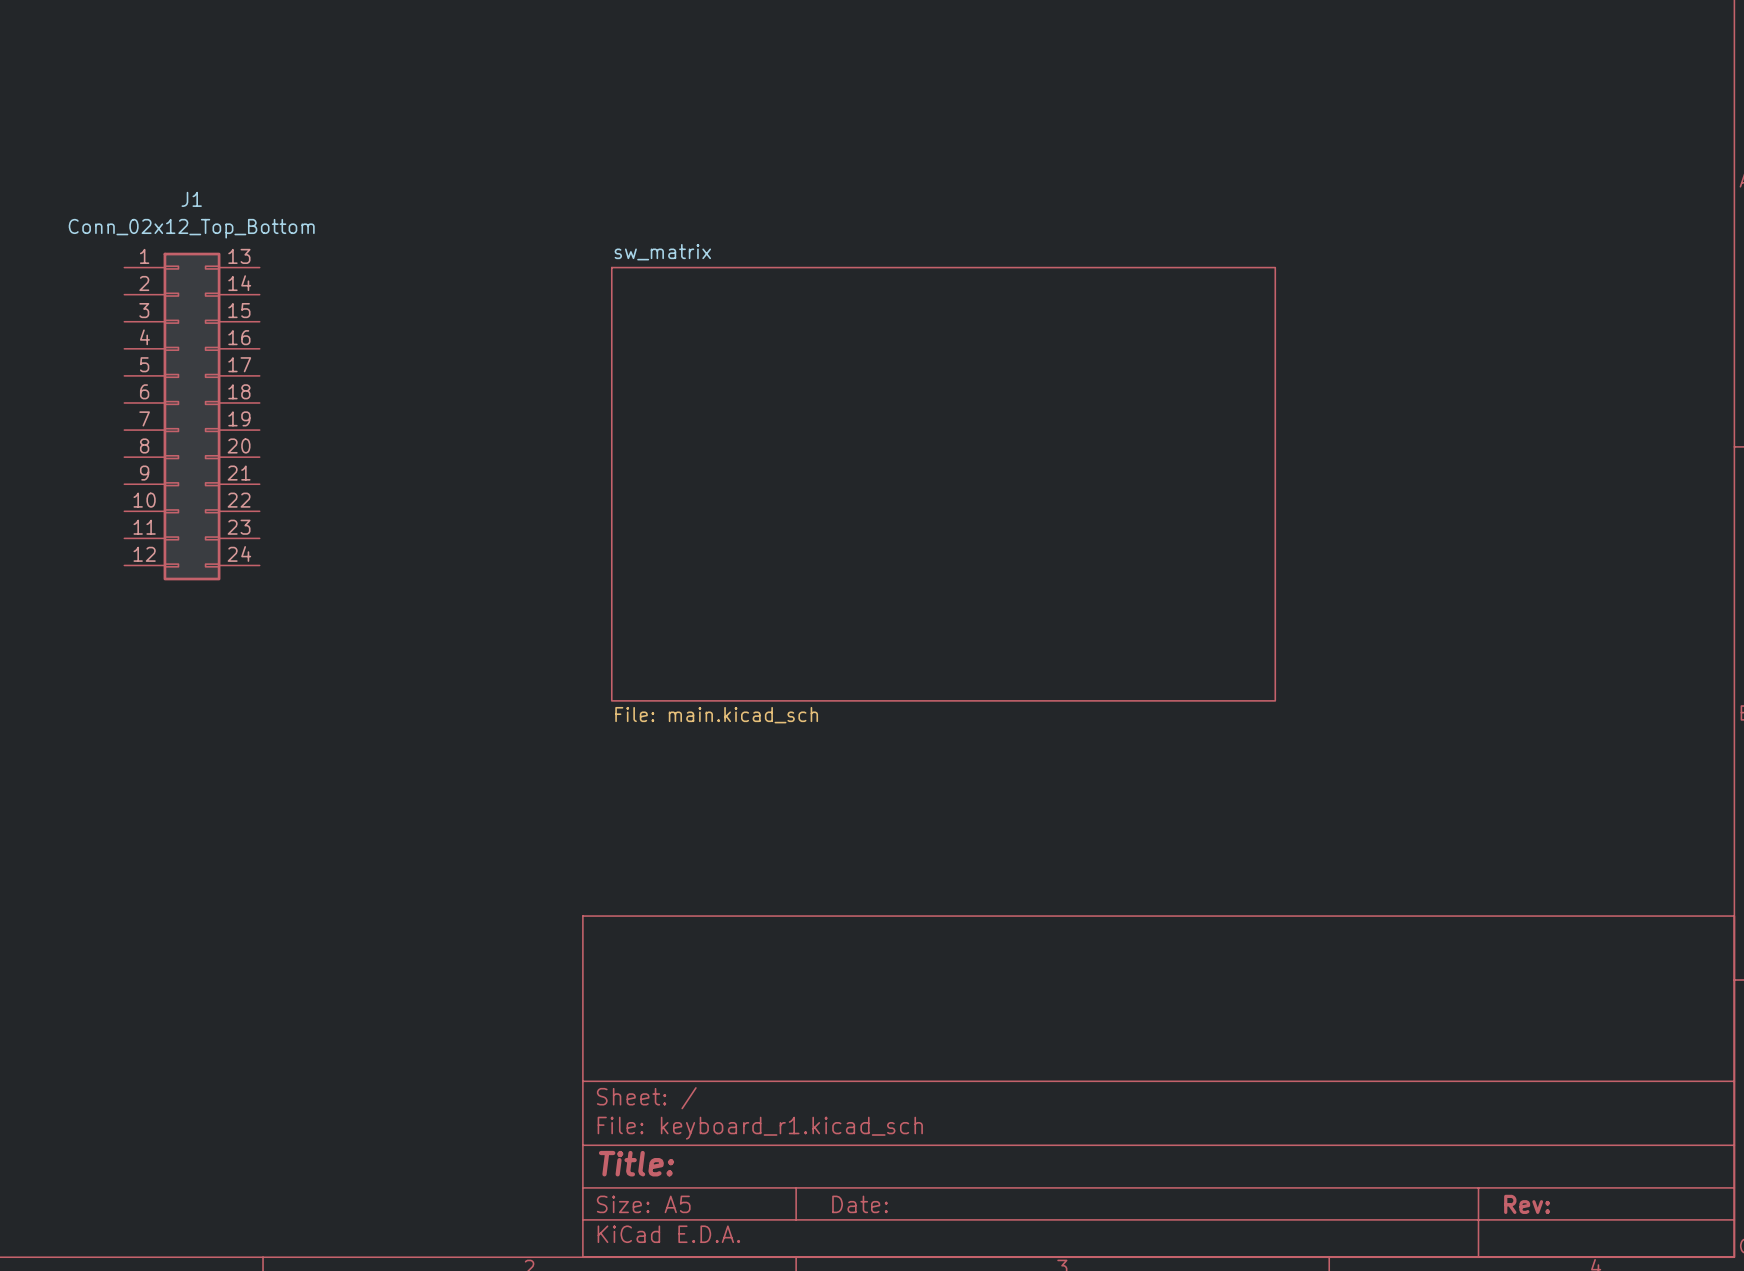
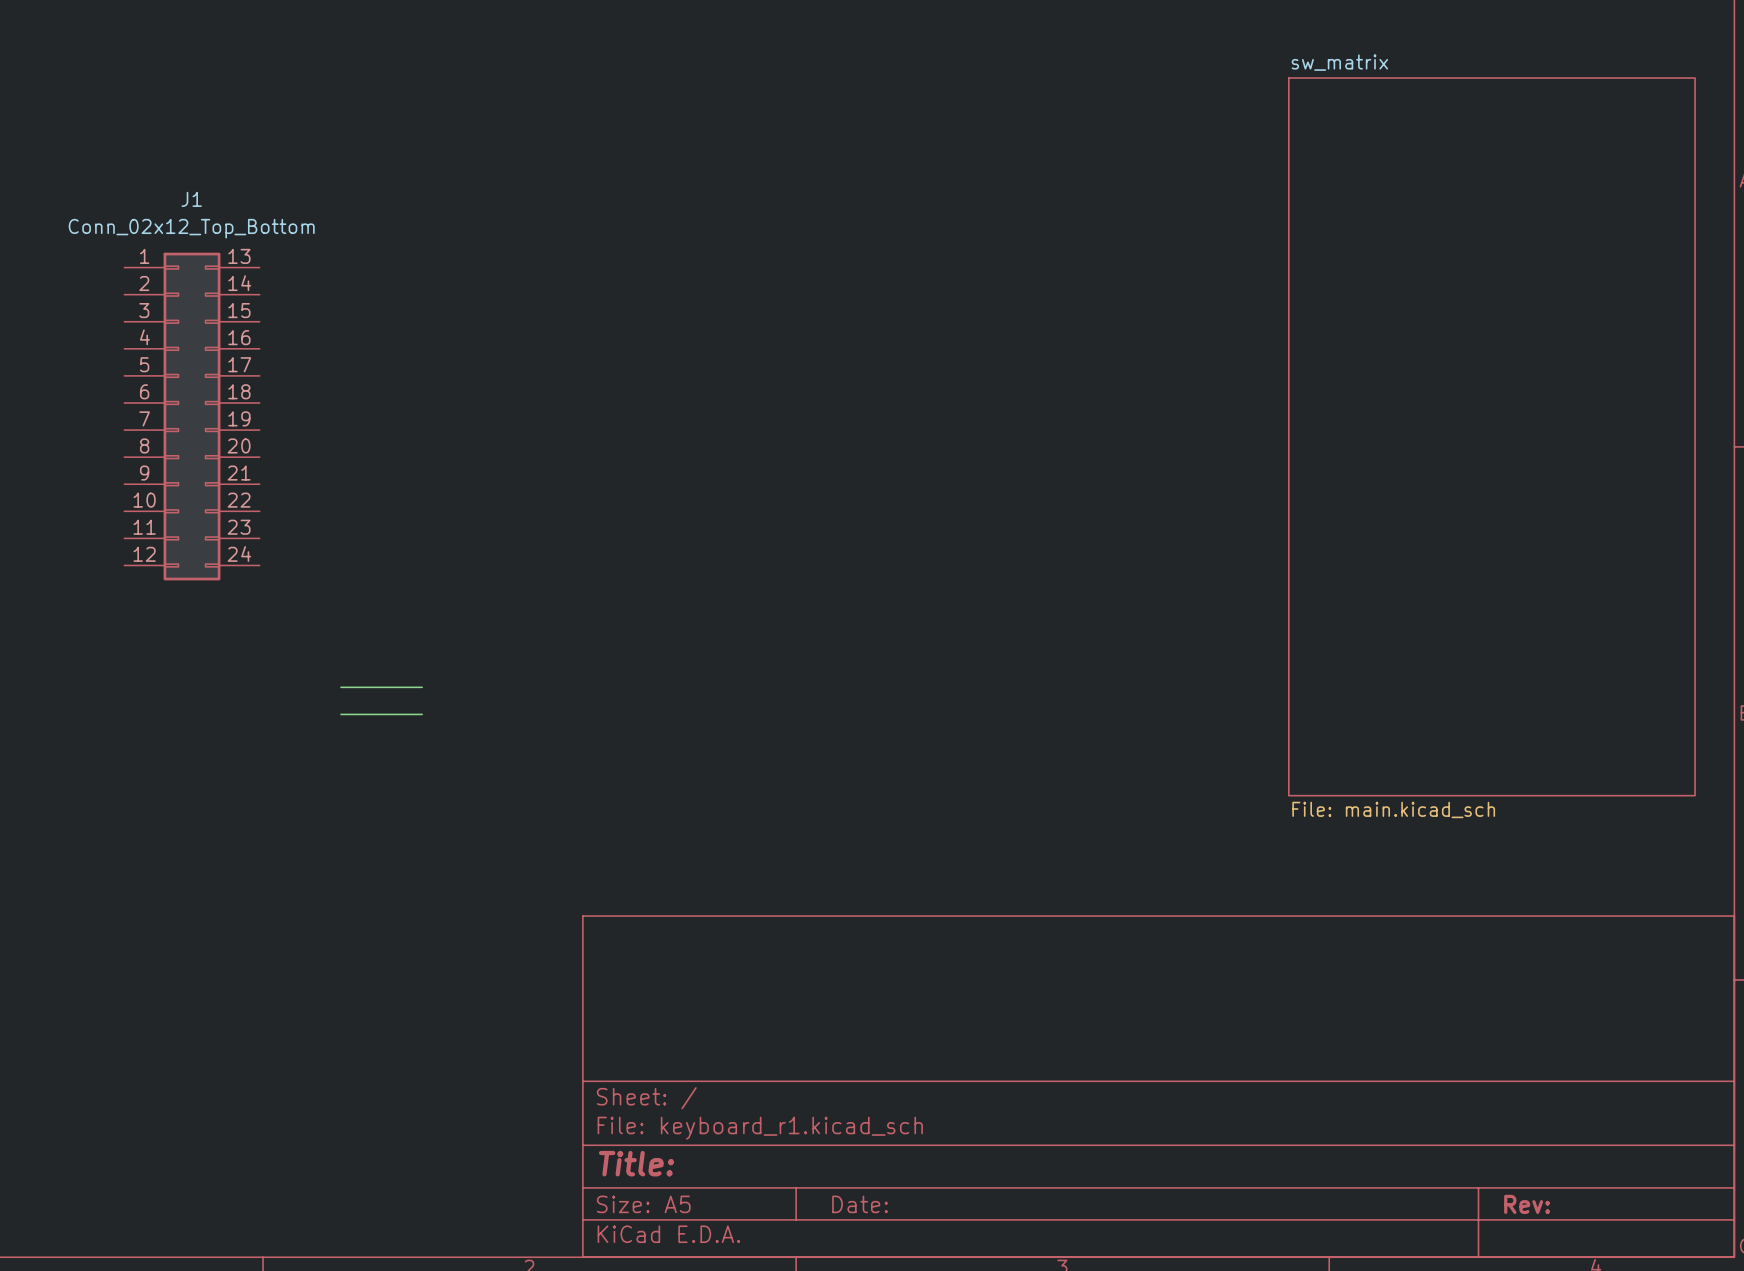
sheet sw_matrix: none -> File: main.kicad_sch (1491, 436)
sheet sw_matrix: File: main.kicad_sch (943, 484) -> none
wire: none -> (340, 687) (422, 687)
wire: none -> (340, 714) (422, 714)

